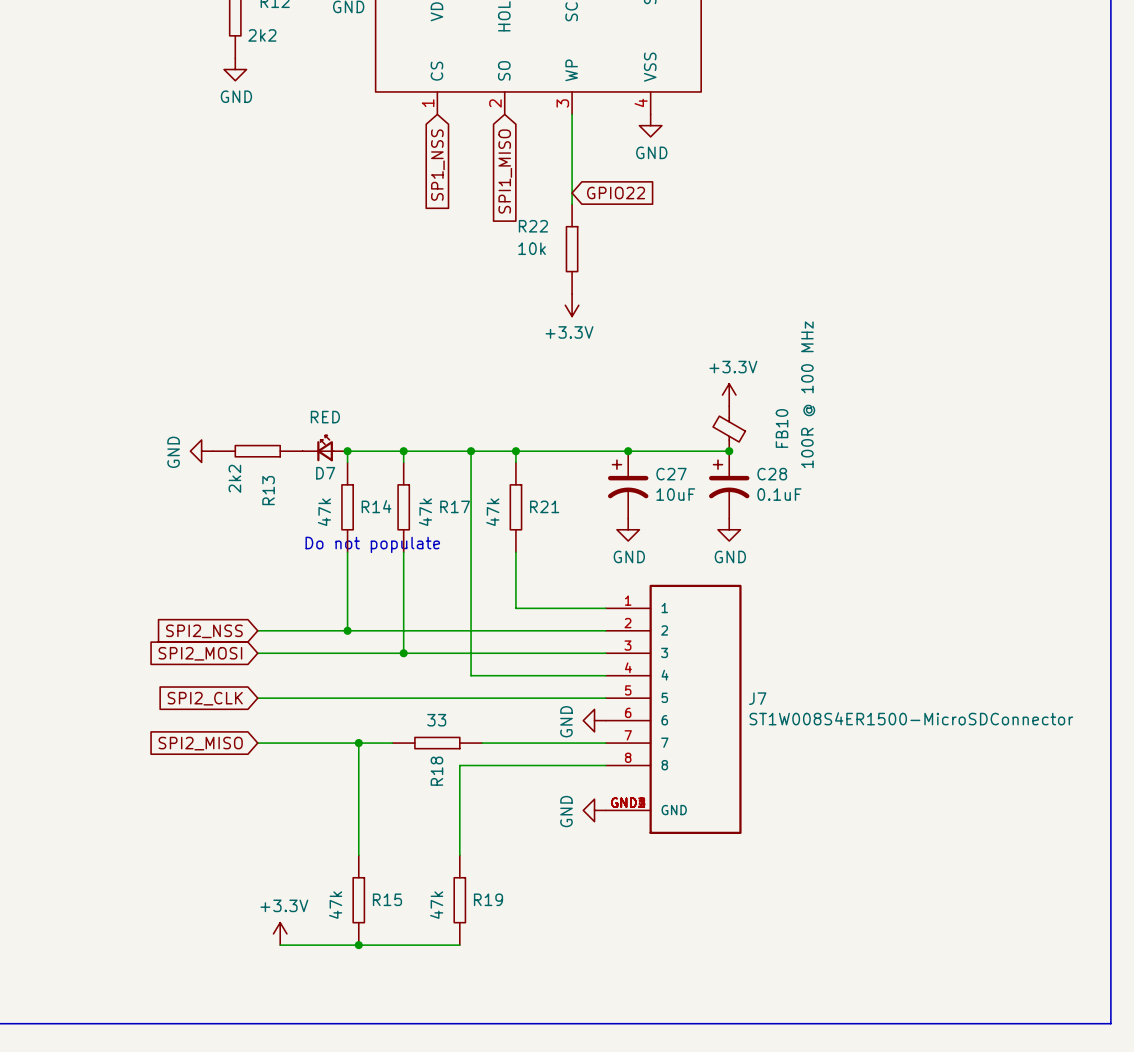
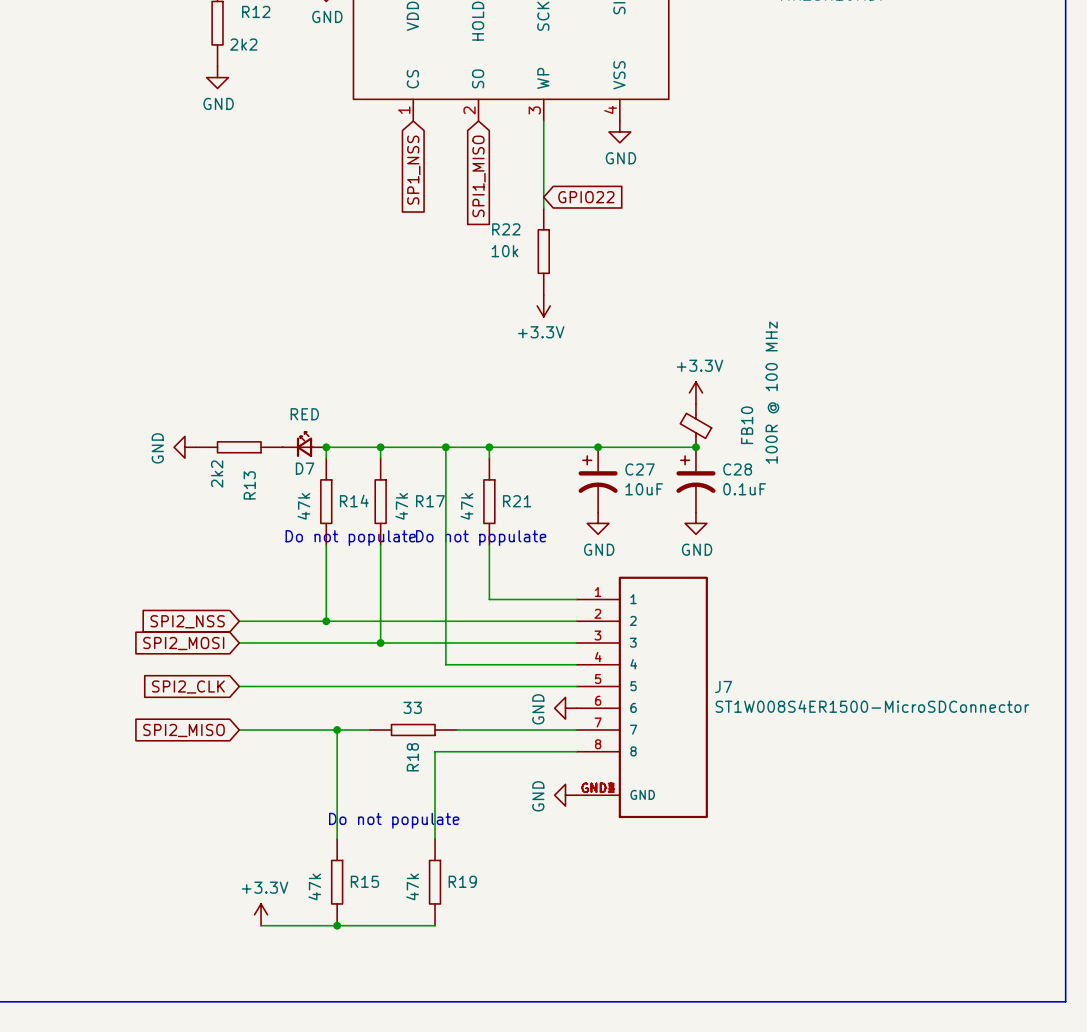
text: none -> Do not populate (481, 538)
text: none -> Do not populate (394, 820)

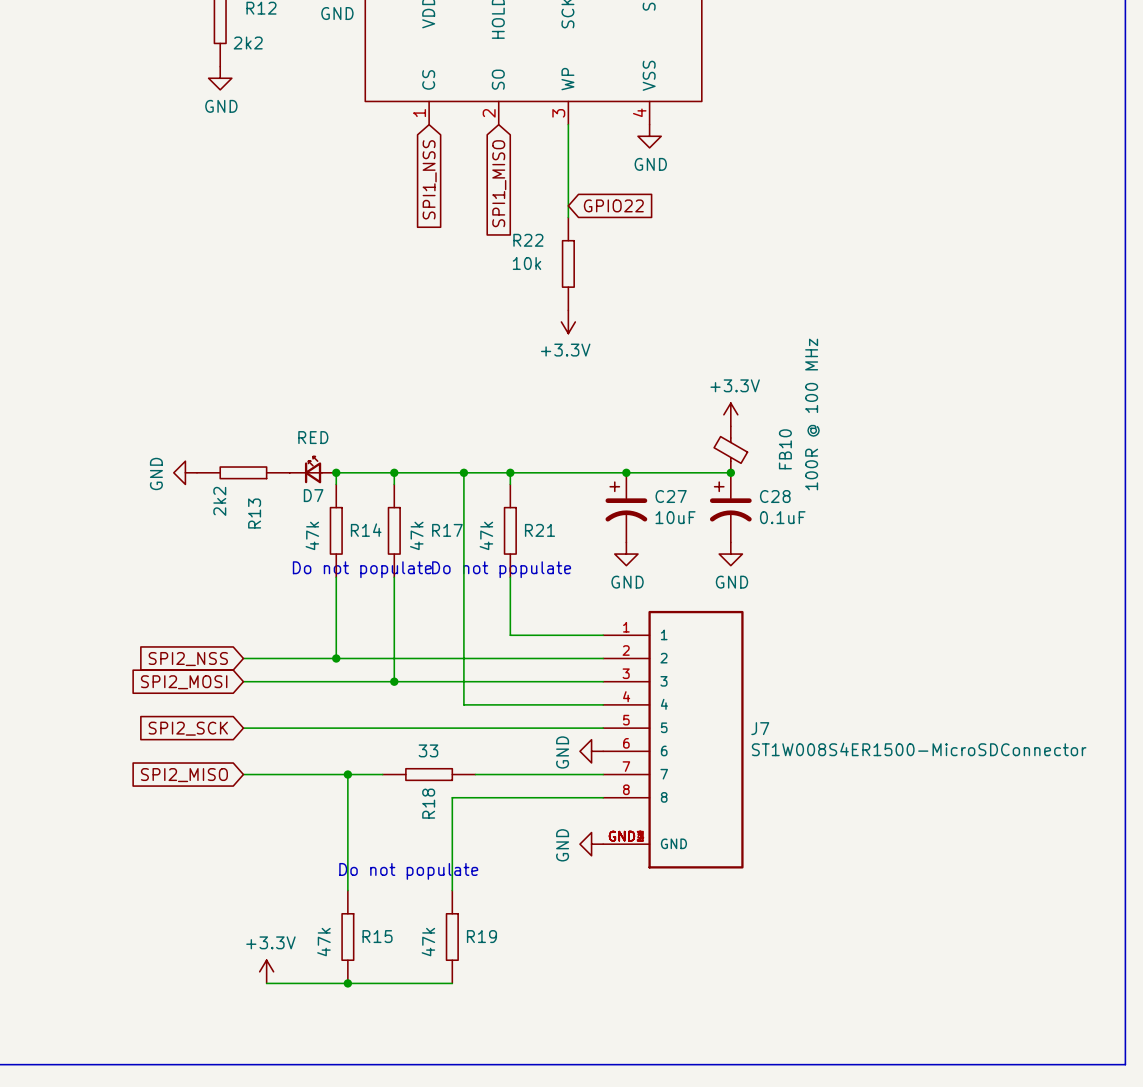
global label: SP1_NSS (413, 170) -> SPI1_NSS (429, 179)
global label: SPI2_CLK (188, 687) -> SPI2_SCK (188, 728)

